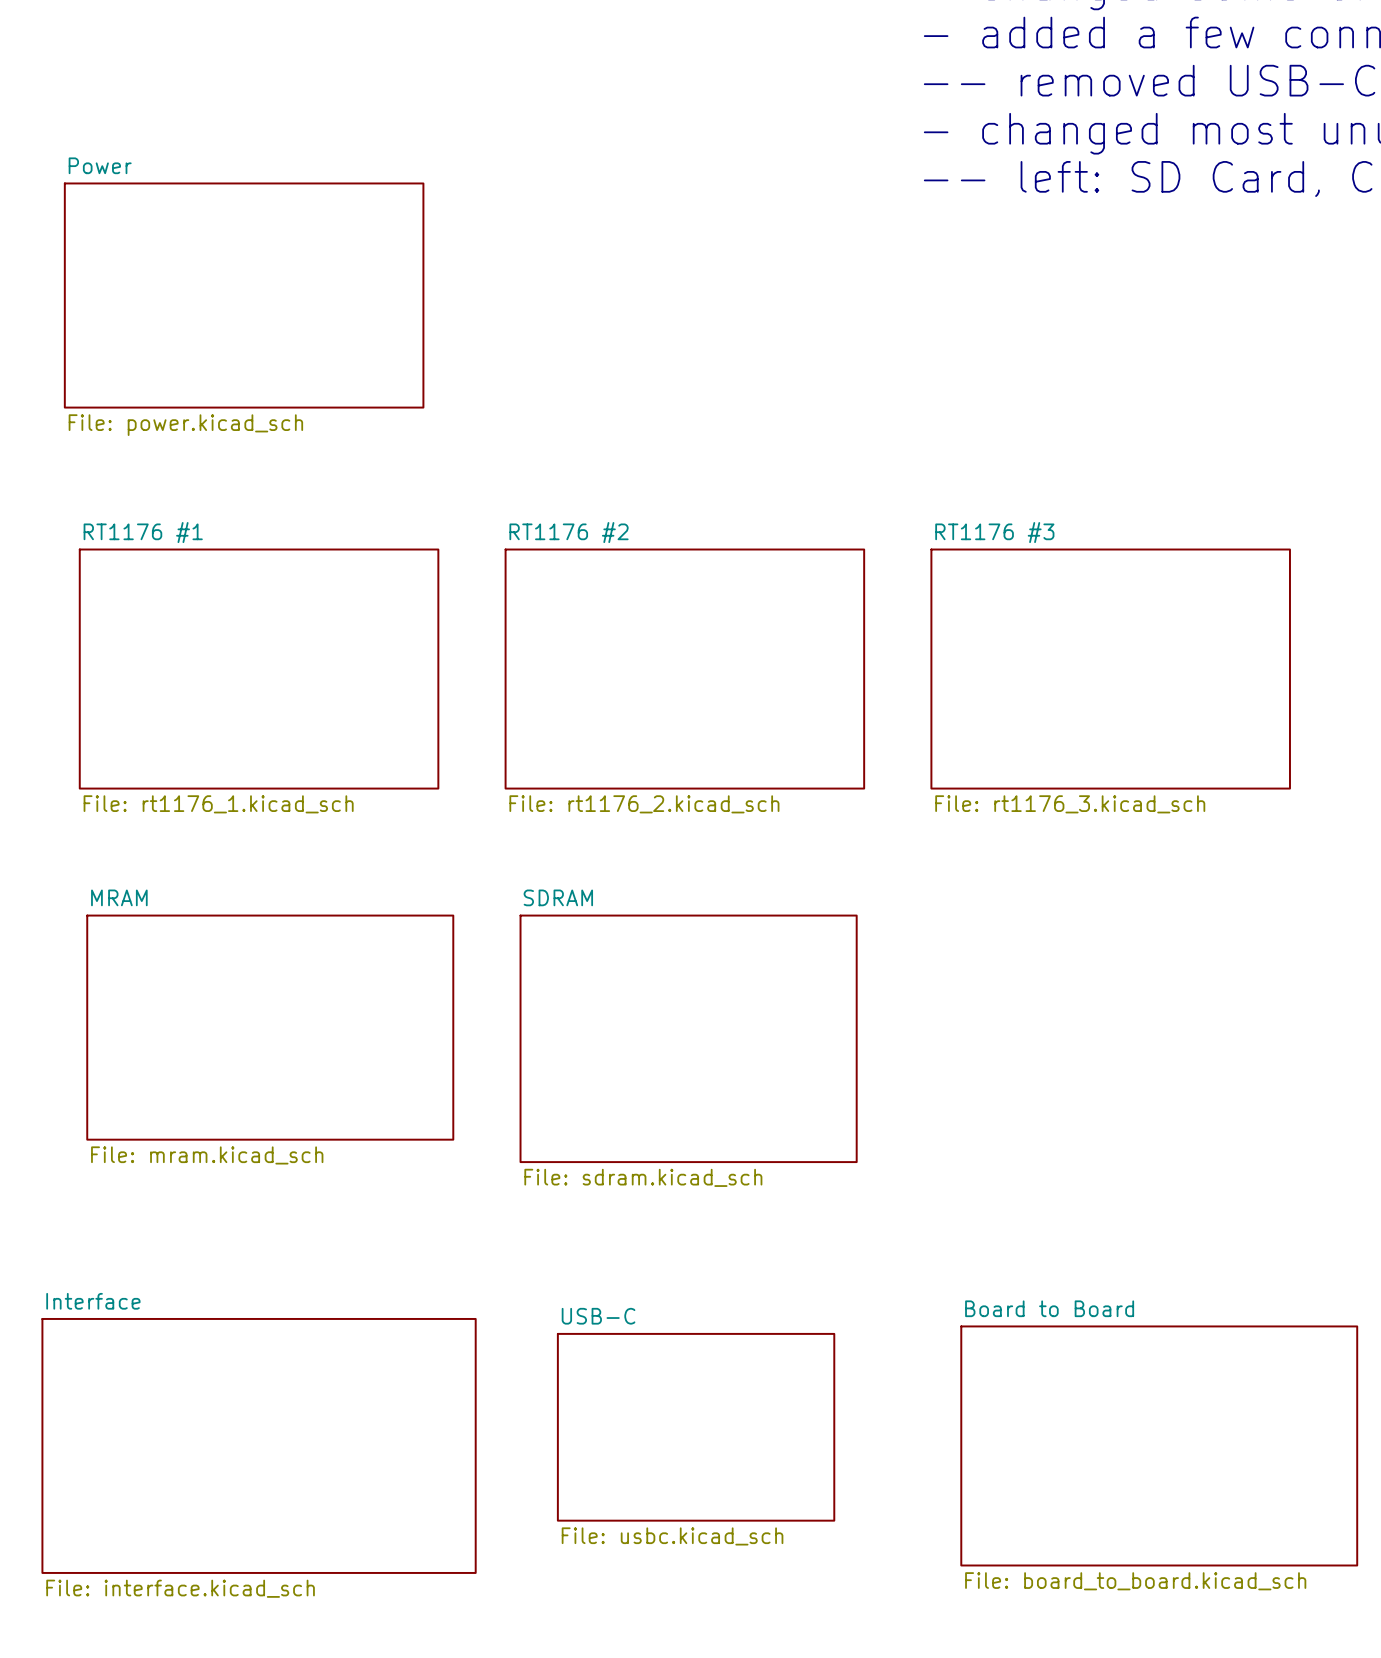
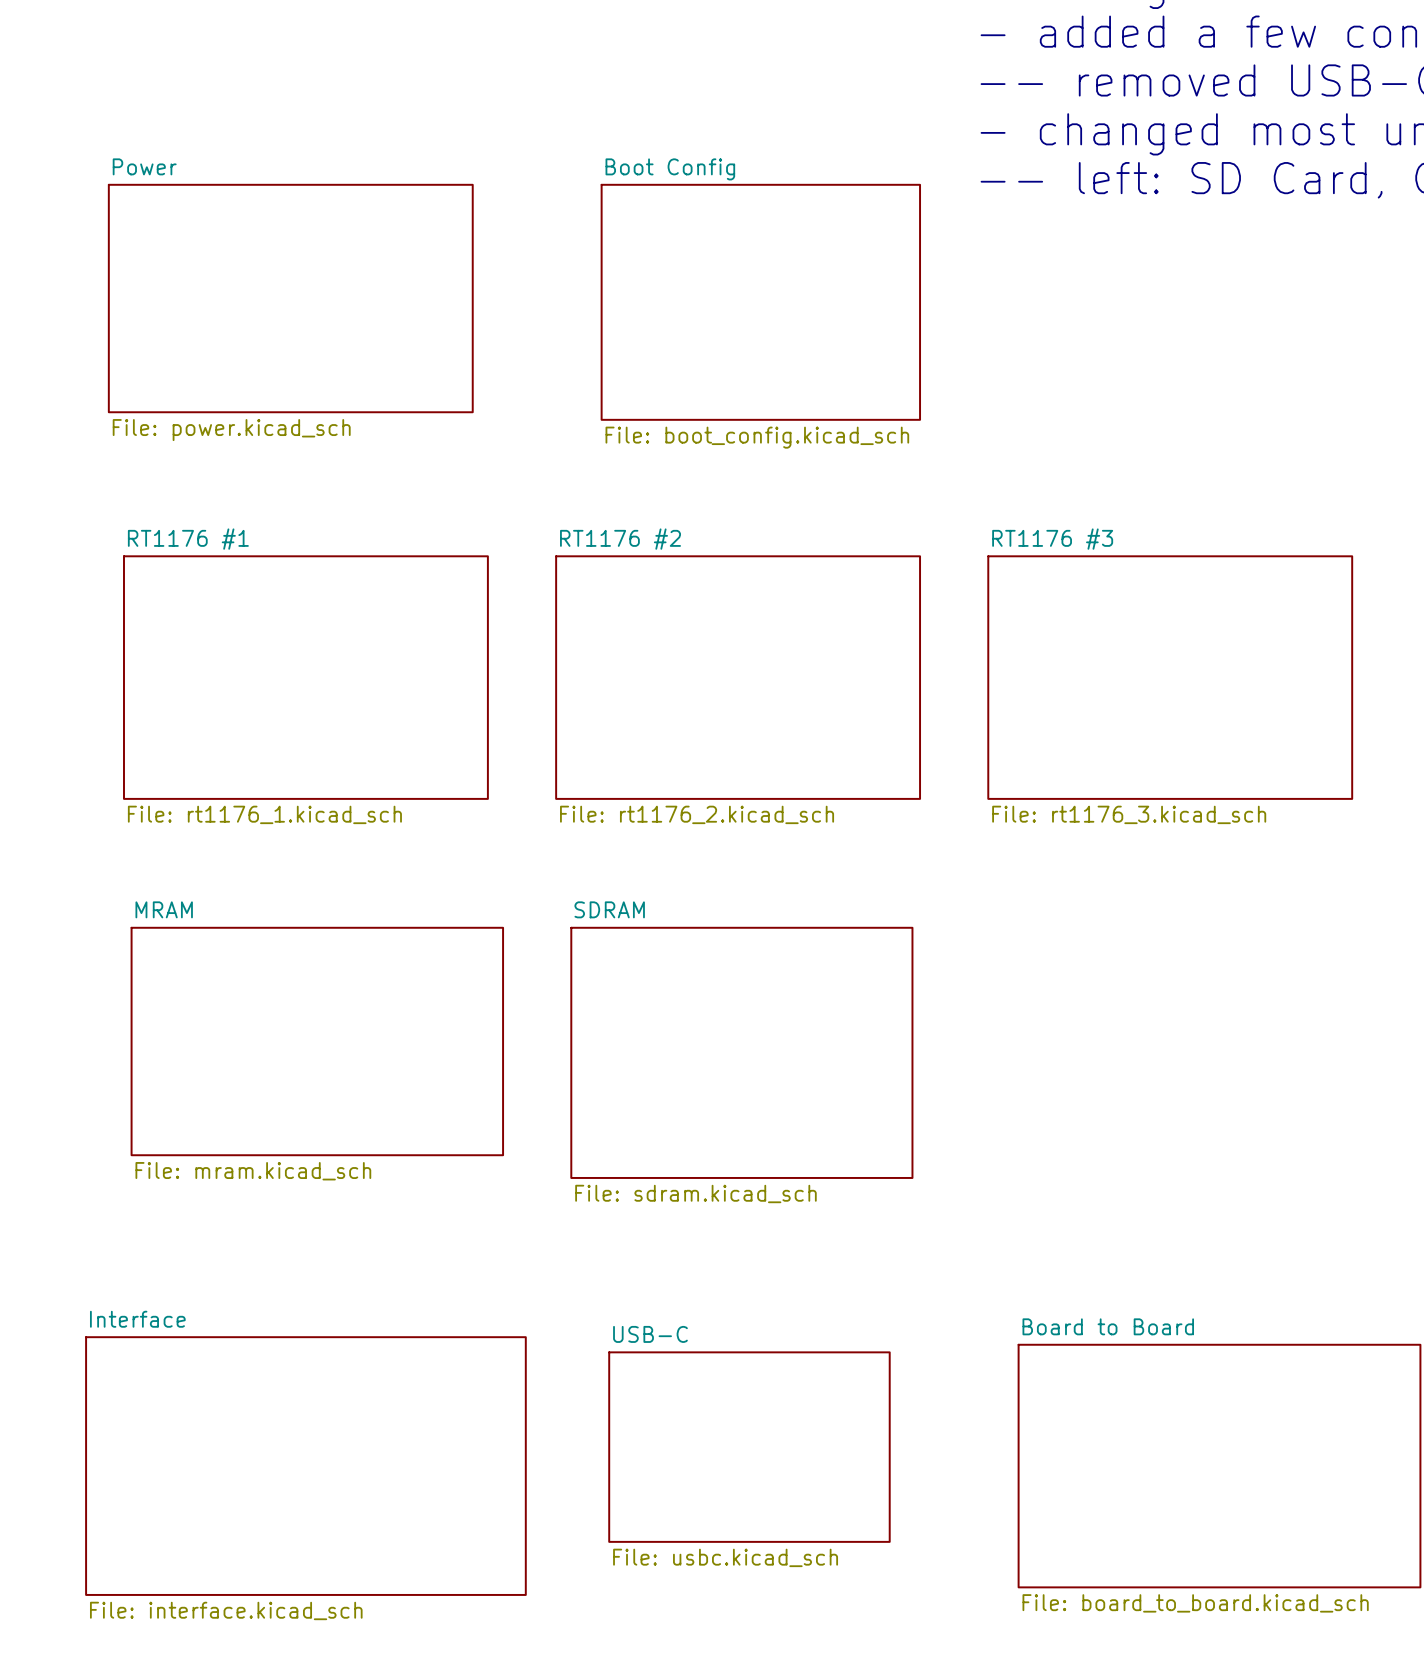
sheet Boot Config: none -> File: boot_config.kicad_sch (760, 302)

